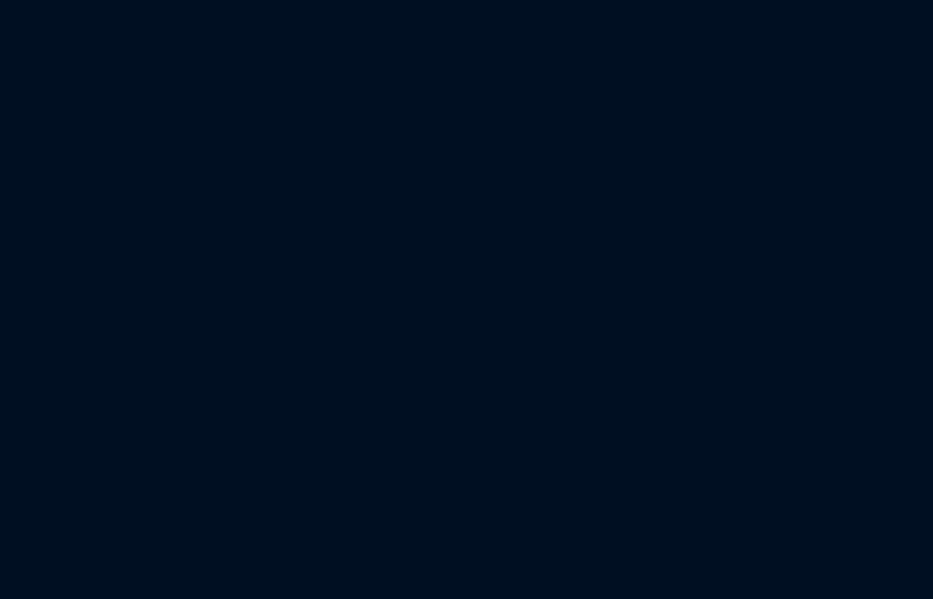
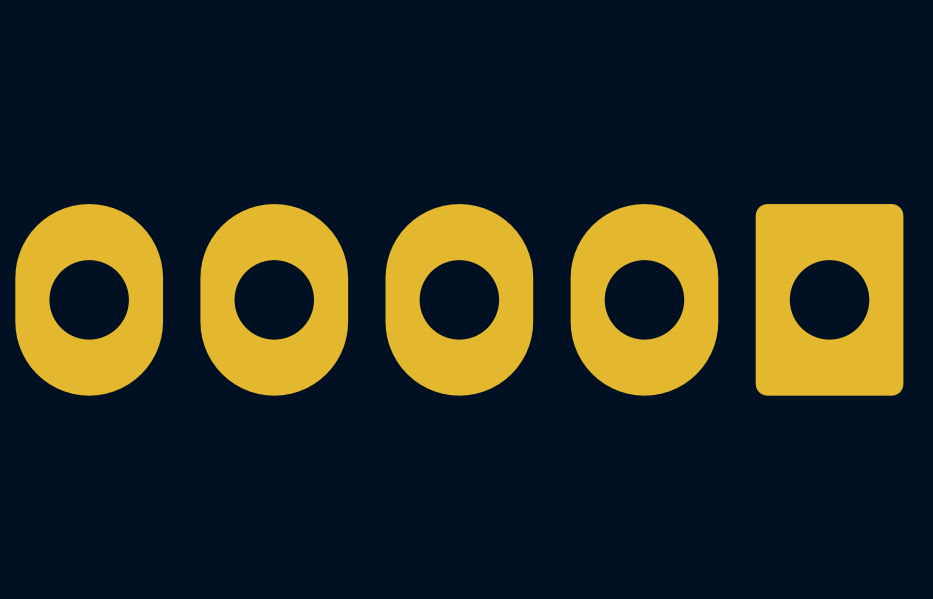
part: none -> (459, 299)

